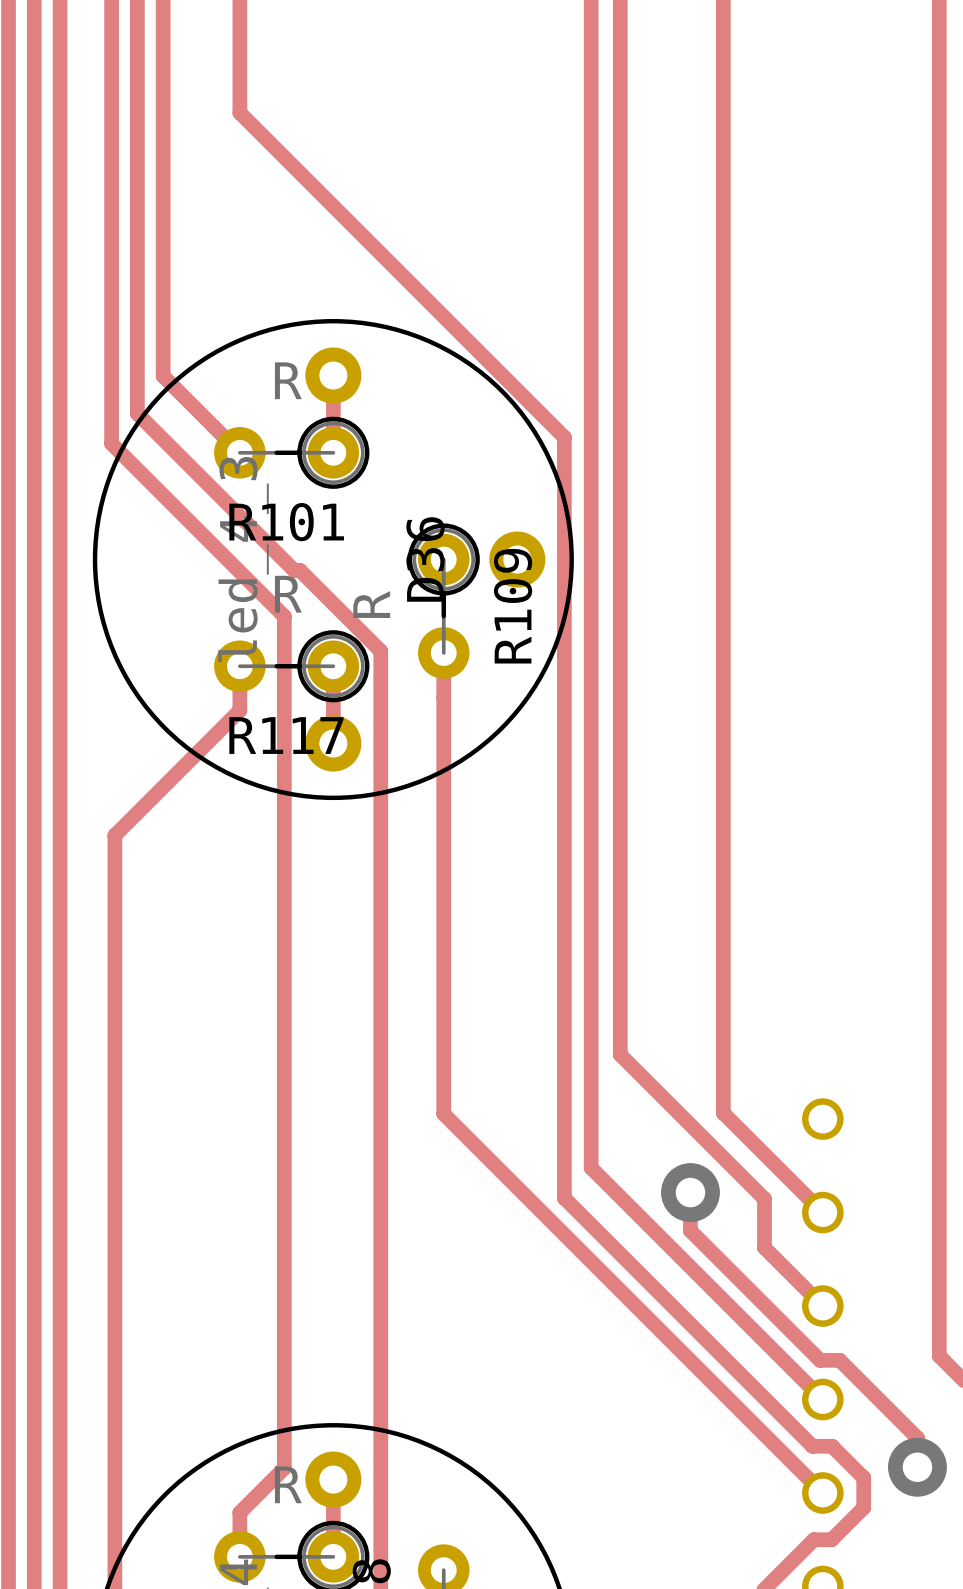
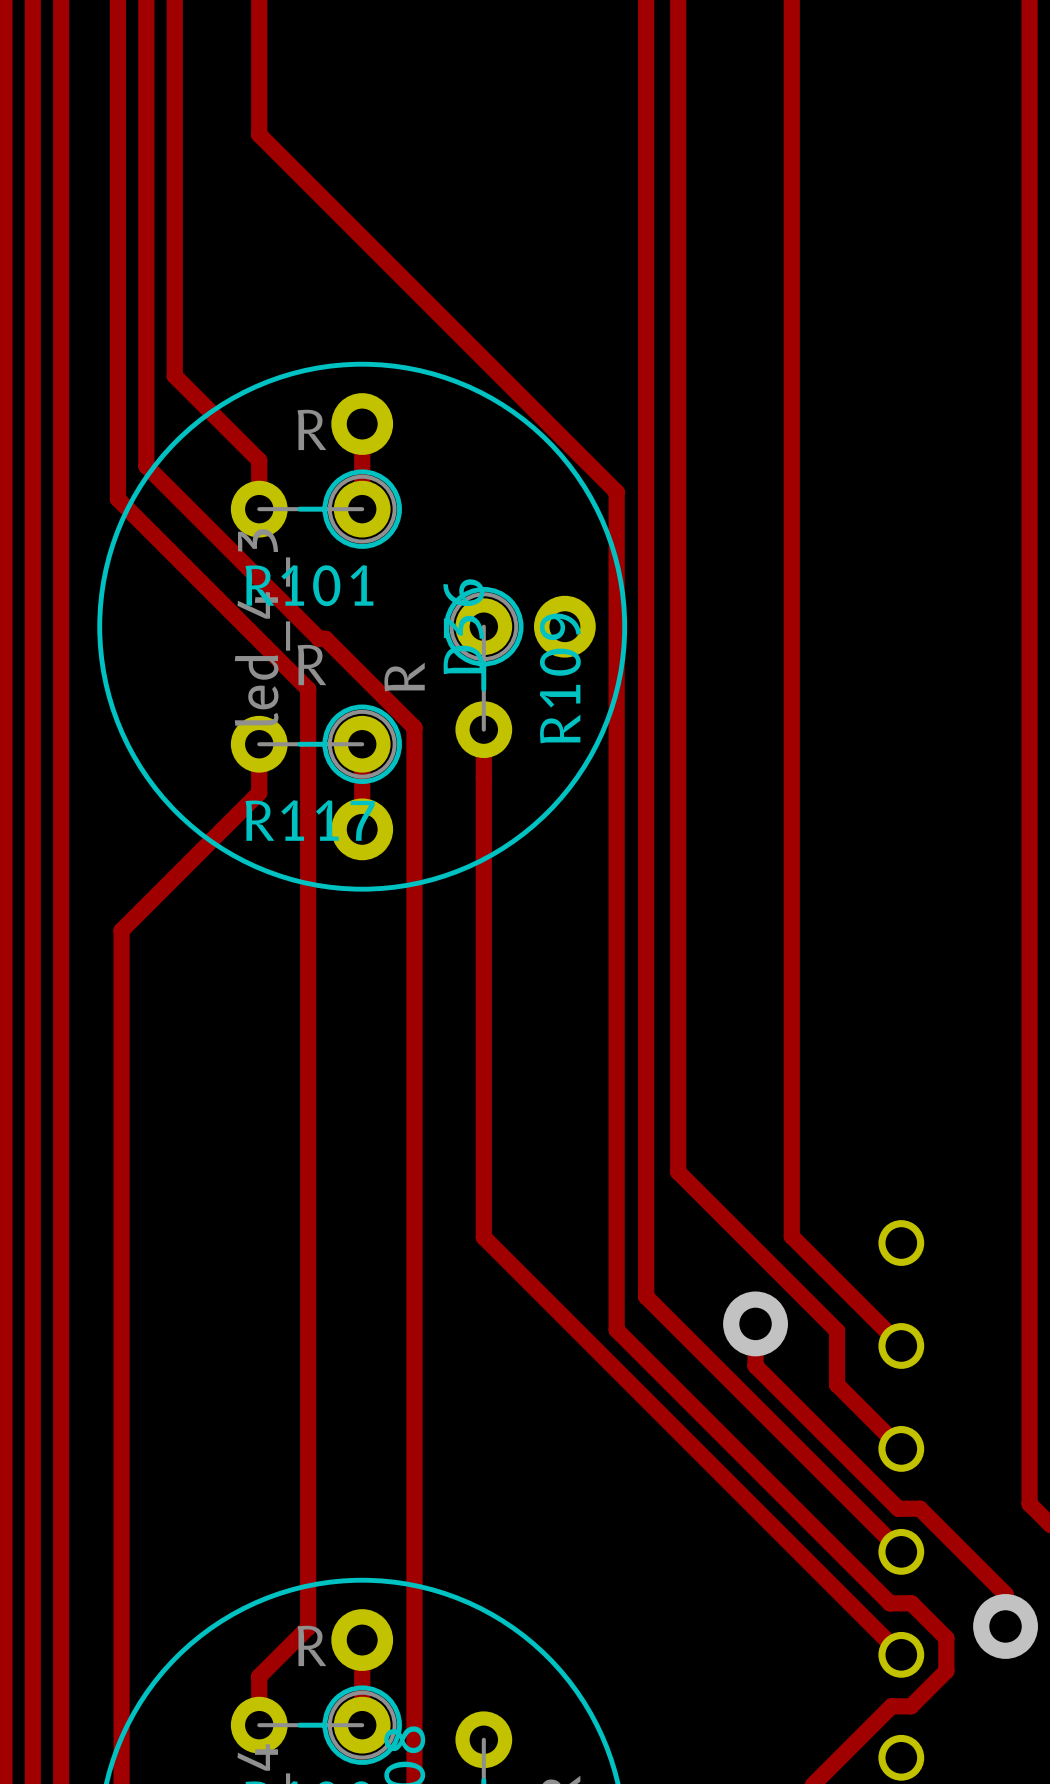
track: (163, 331) (163, 376) (239, 452) -> (174, 375) (259, 460) (259, 509)

